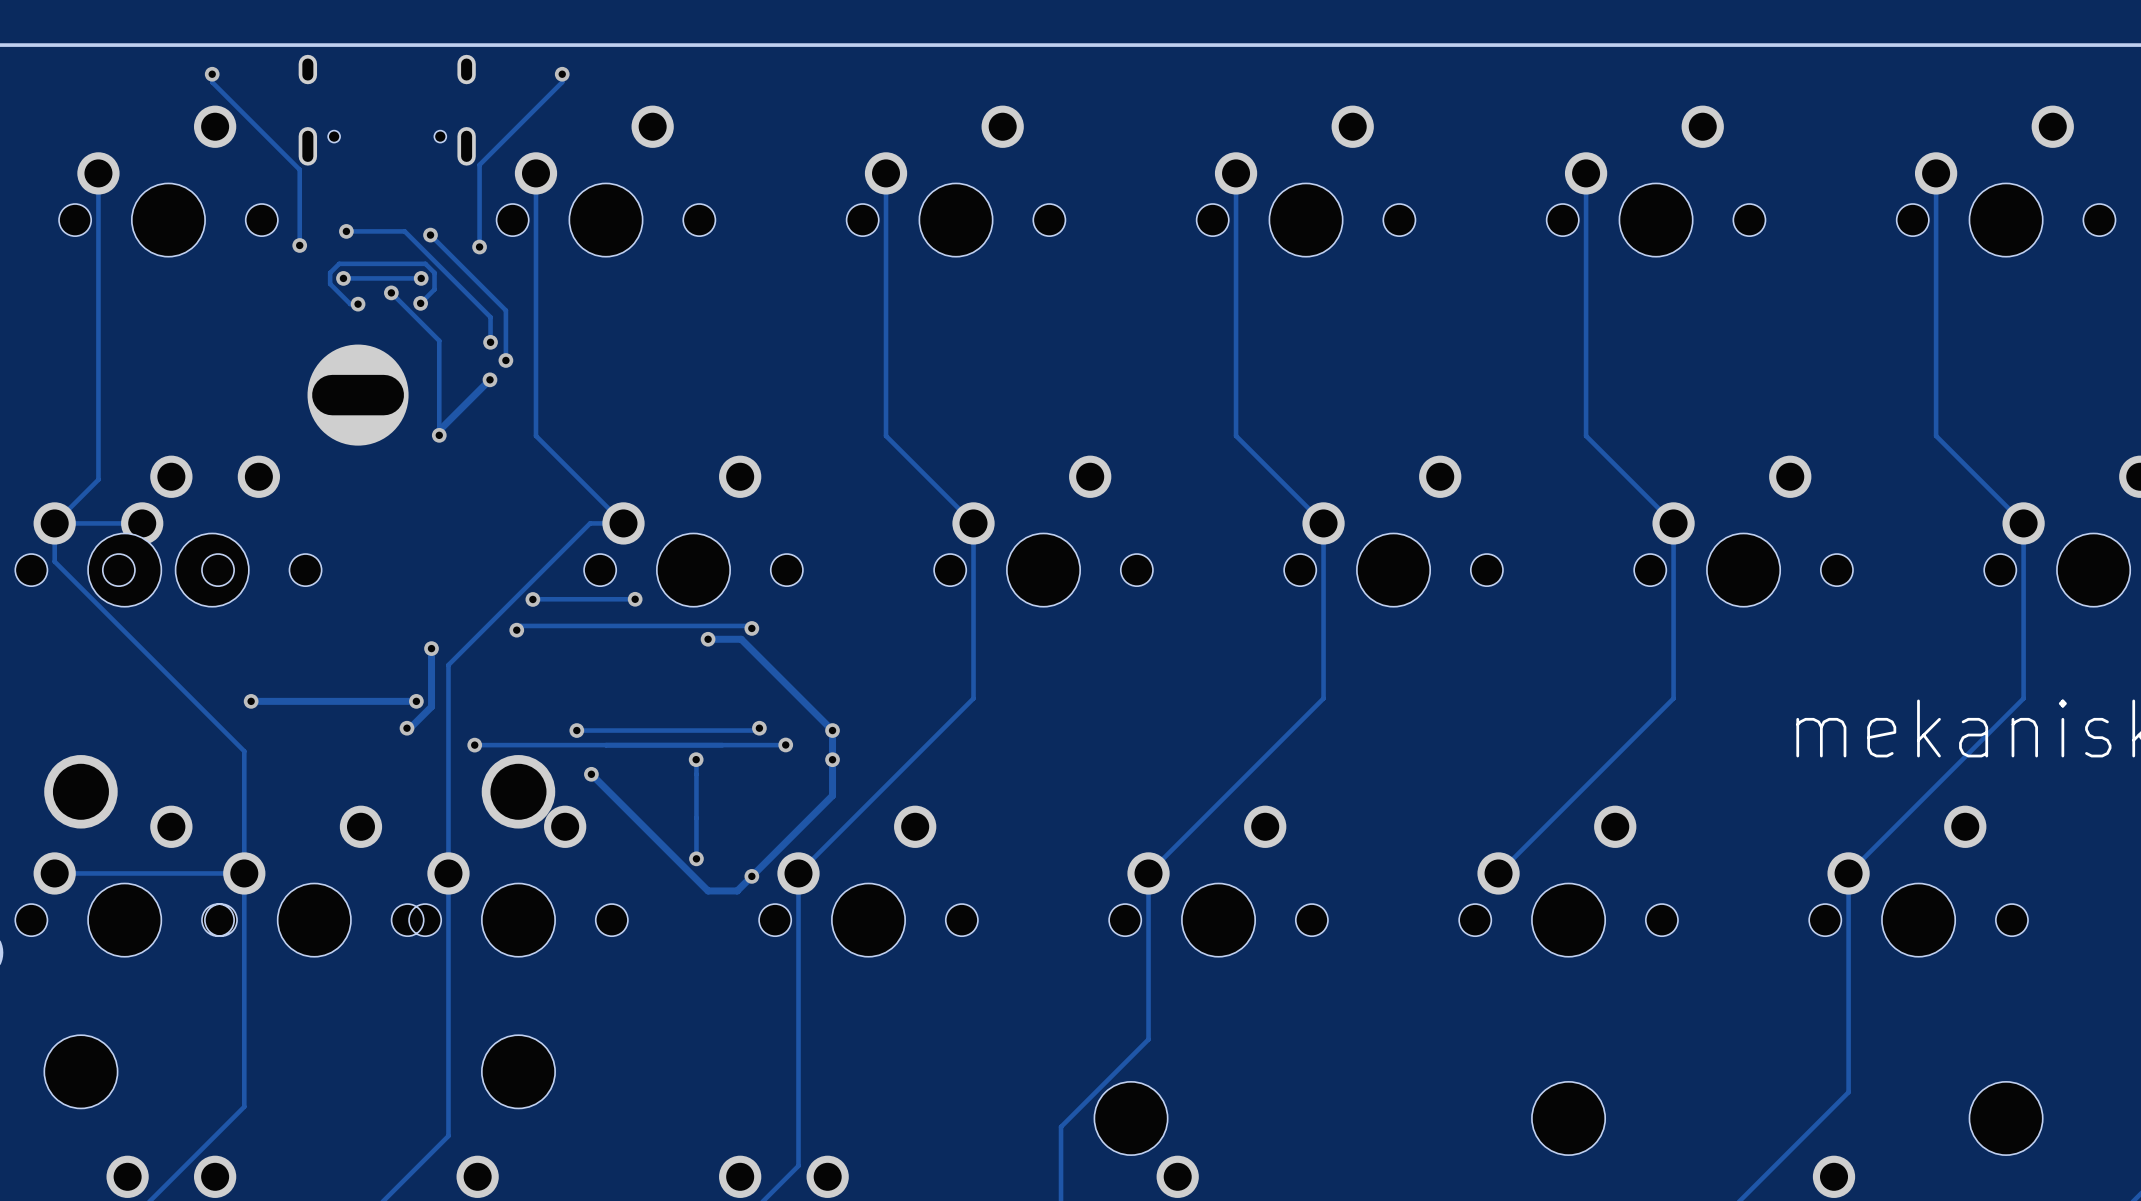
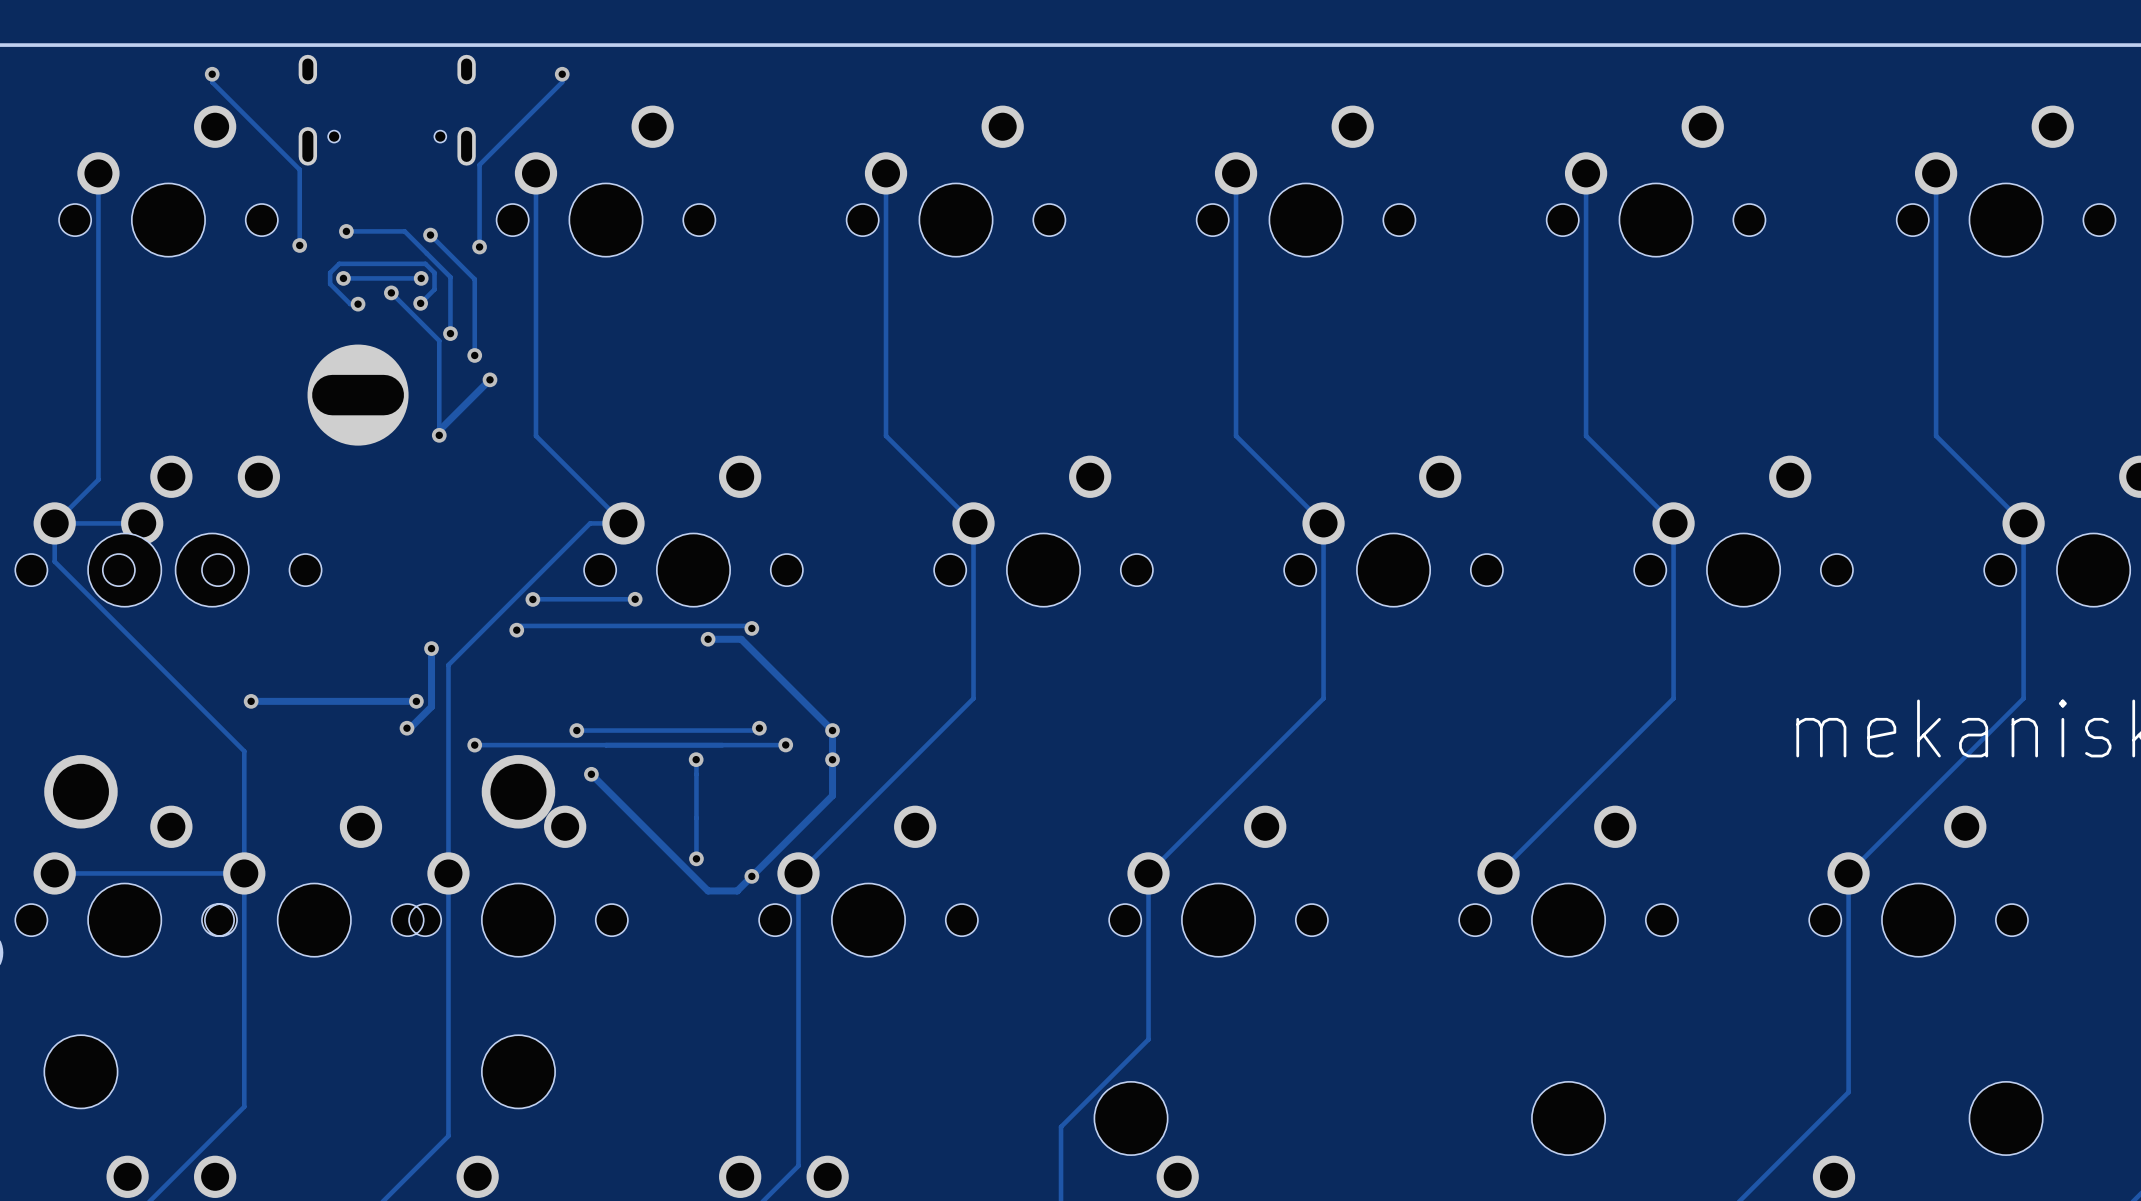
track: (450, 277) (490, 317) (490, 342) -> (450, 277) (450, 333)
track: (474, 279) (505, 310) (505, 360) -> (474, 279) (474, 355)
via: none -> (450, 333)
via: (490, 342) -> none
via: none -> (474, 355)
via: (505, 360) -> none

